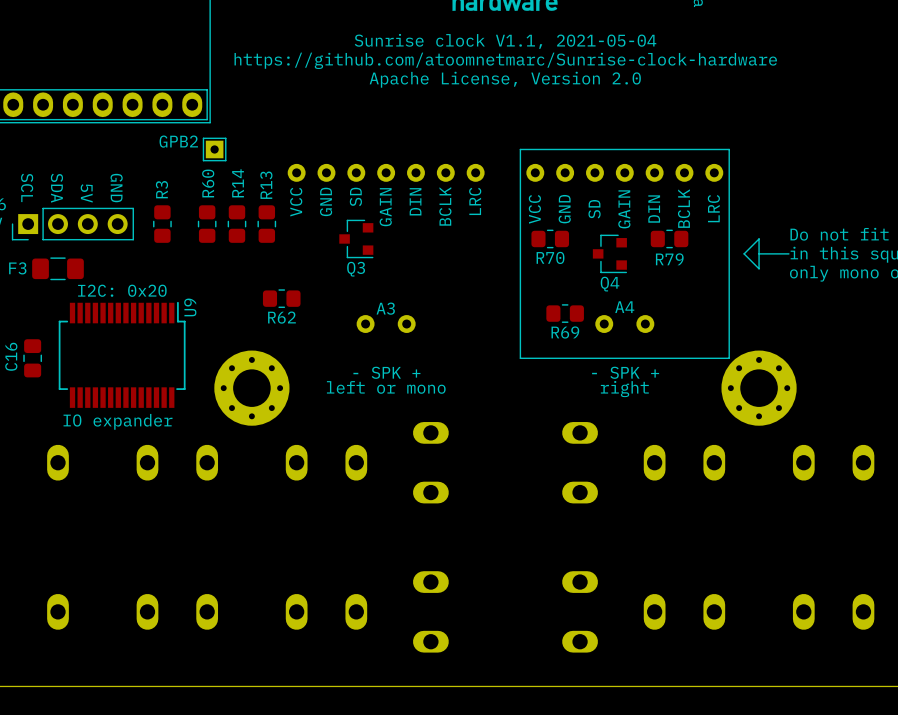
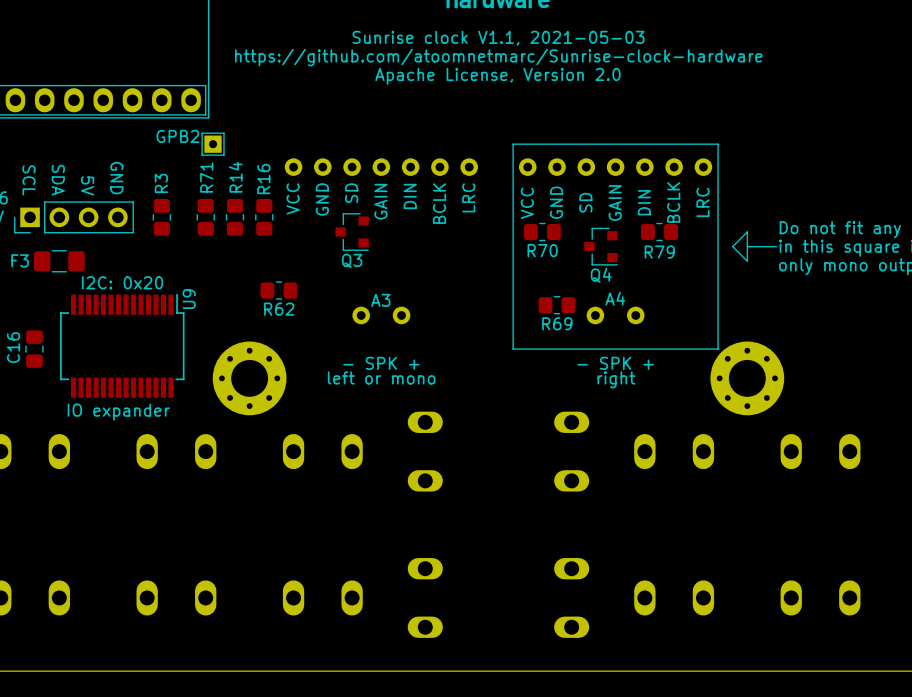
text: Sunrise clock V1.1, 2021-05-04 (505, 41) -> Sunrise clock V1.1, 2021-05-03 (498, 38)
R60 name: R60 (208, 183) -> R71 (206, 177)
R13 name: R13 (266, 185) -> R16 (263, 179)

